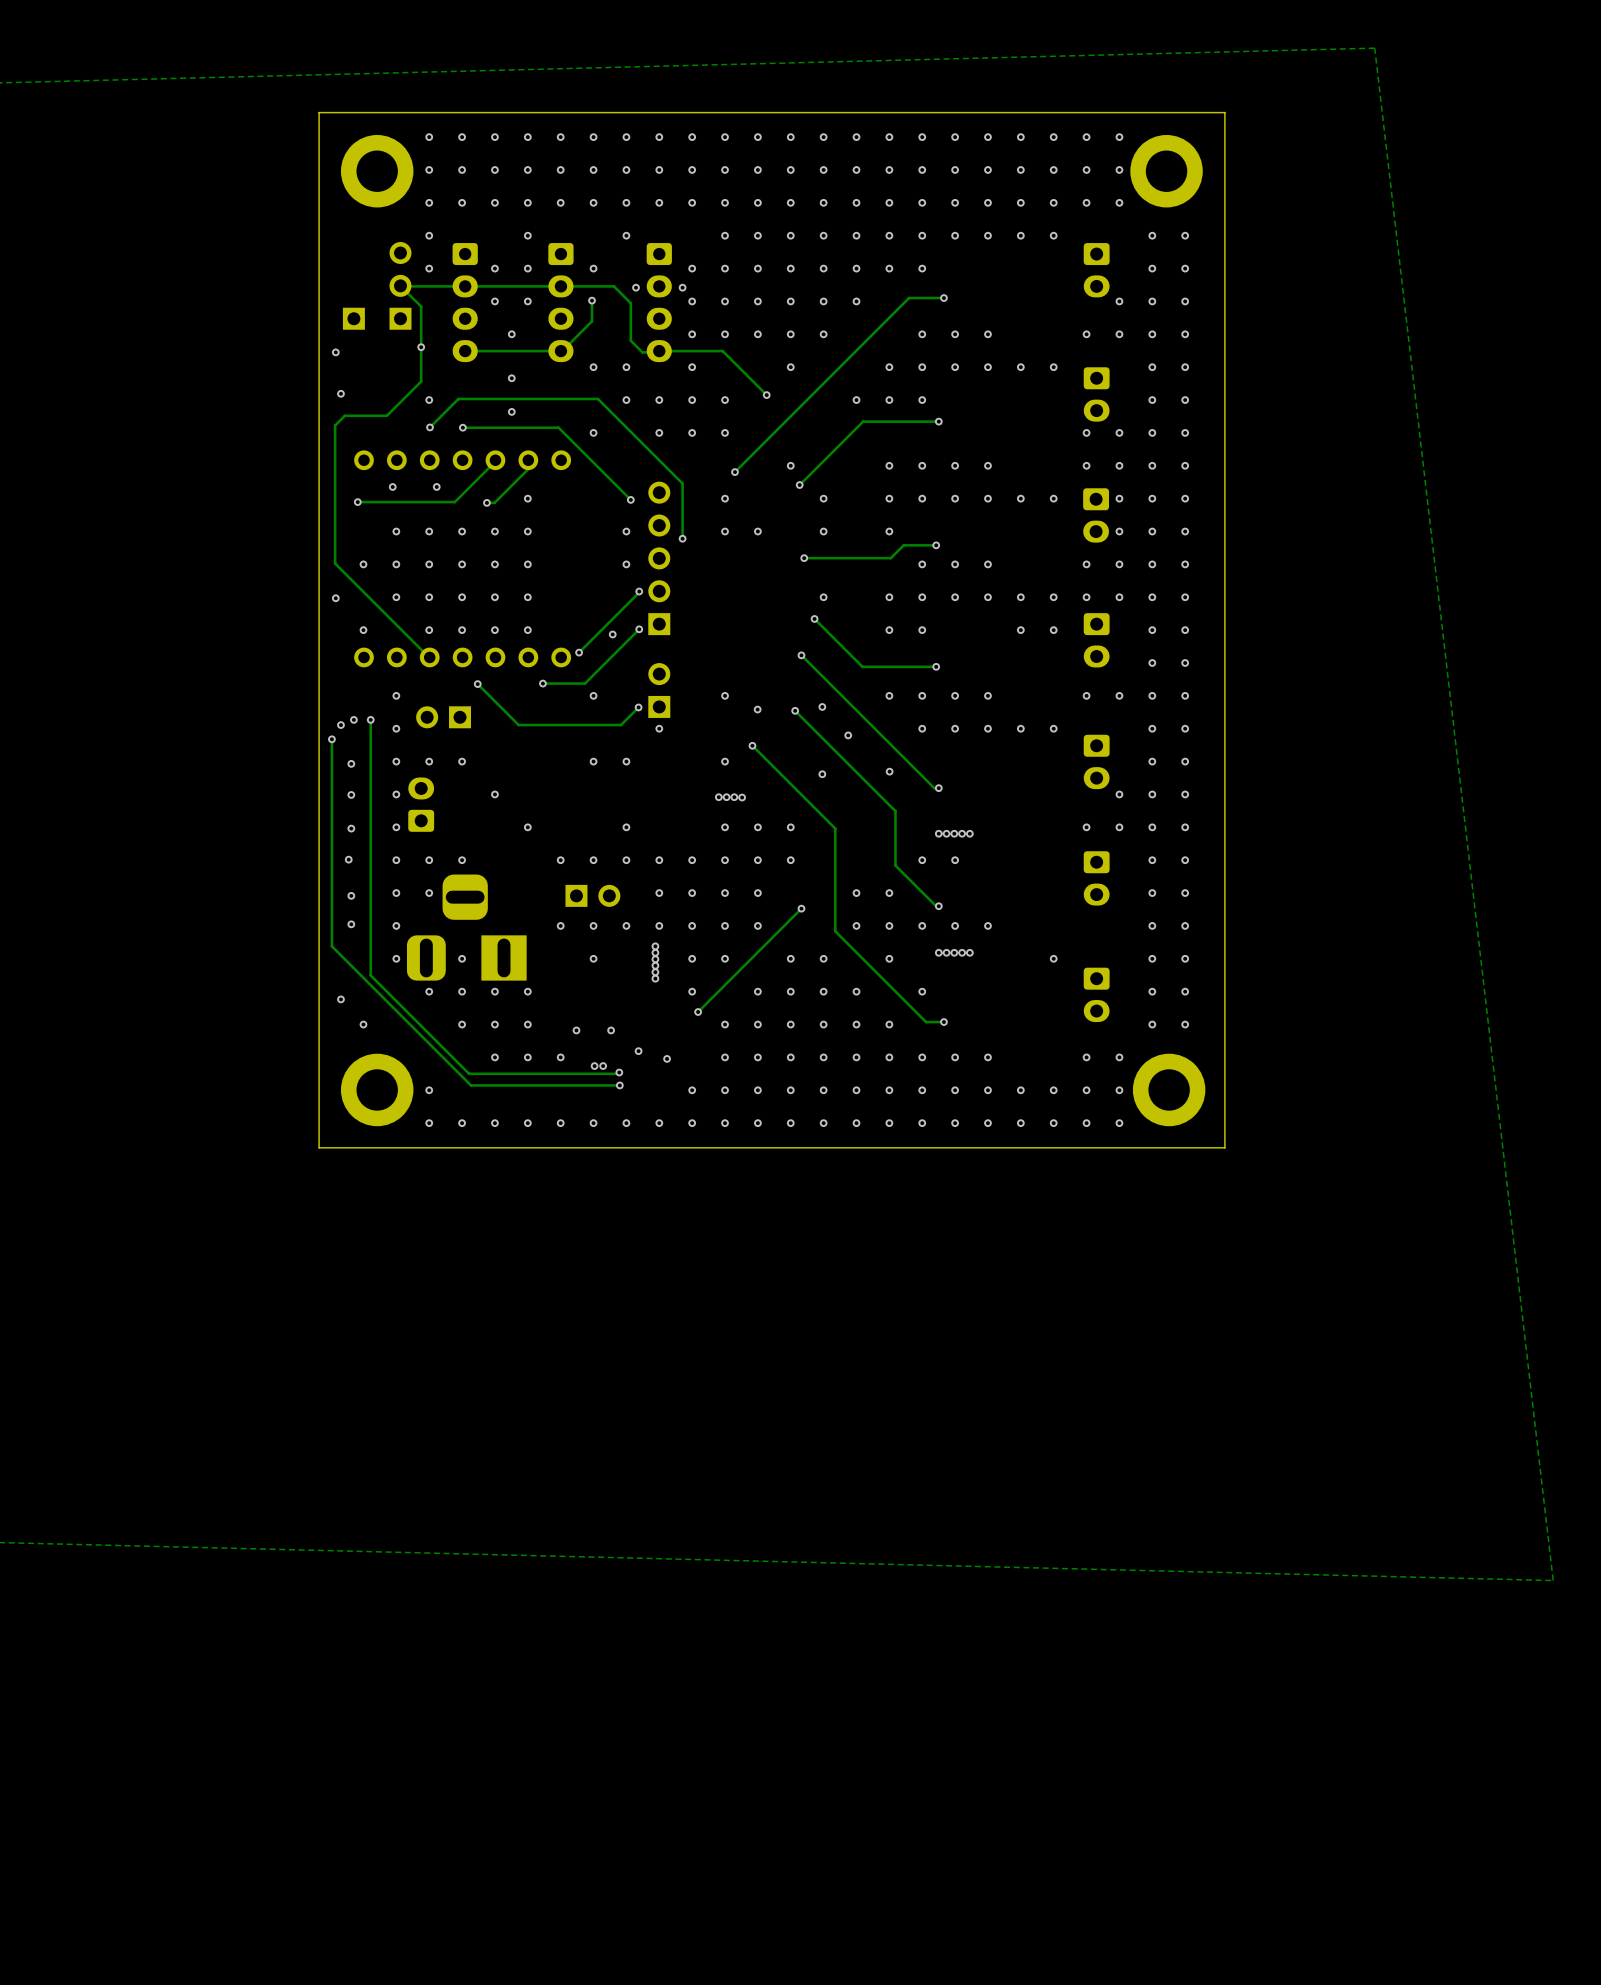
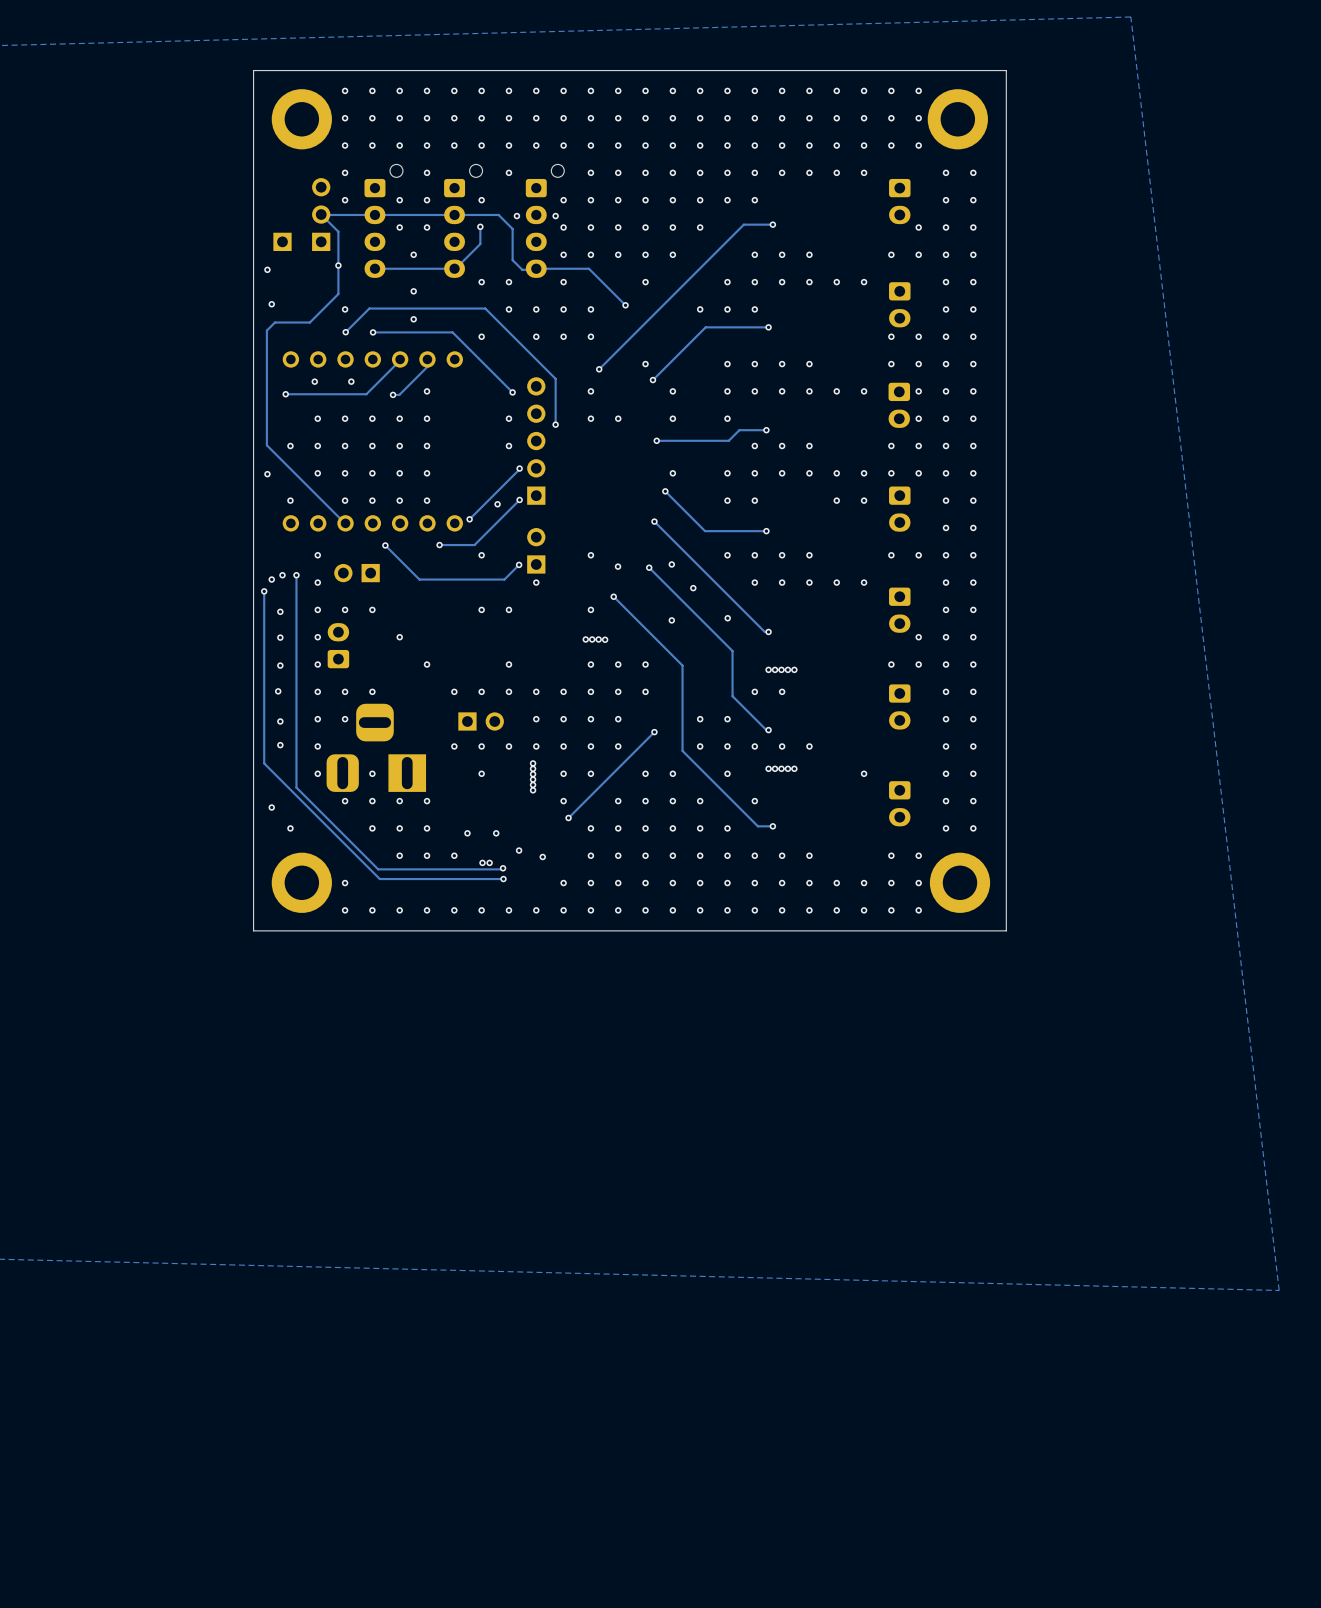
part: none -> (383, 221)
part: none -> (463, 221)
part: none -> (545, 221)

